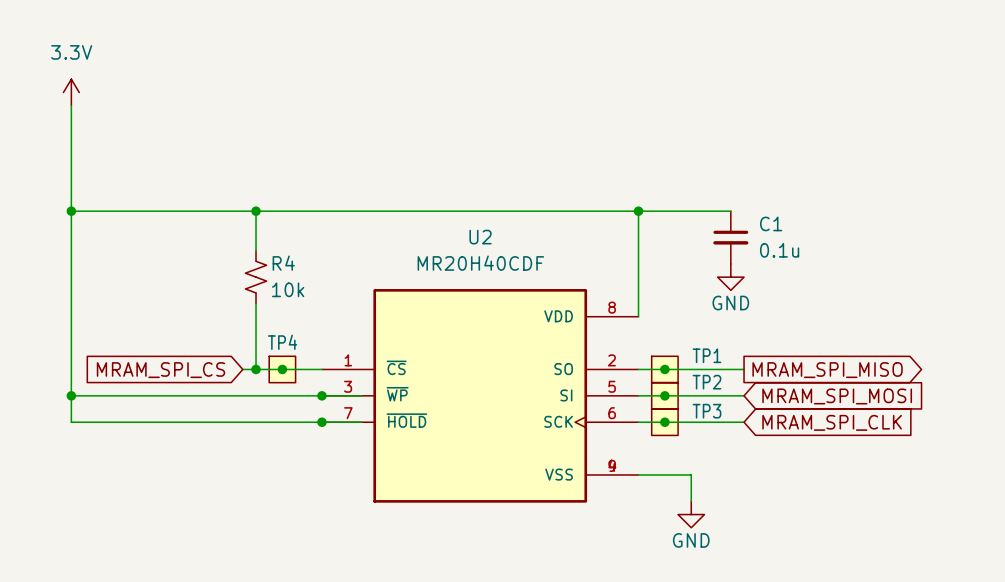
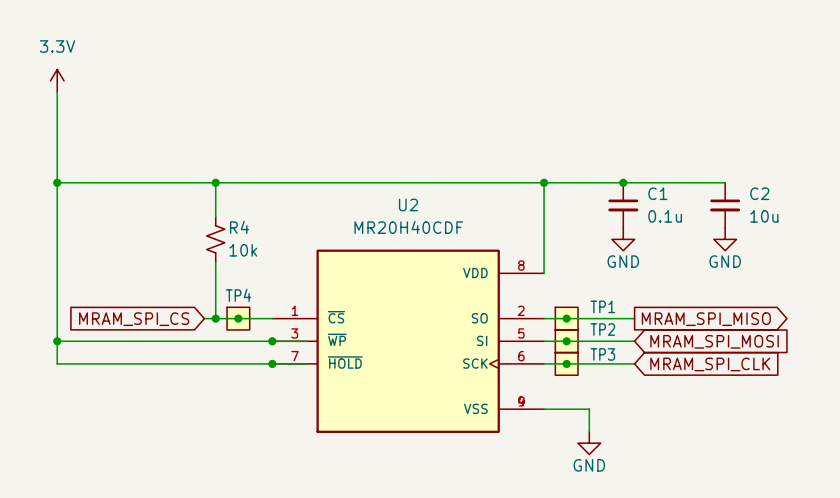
wire: none -> (623, 182) (725, 182)
junction: none -> (623, 182)
C2: none -> 10u (725, 205)
power symbol: none -> GND (725, 239)

